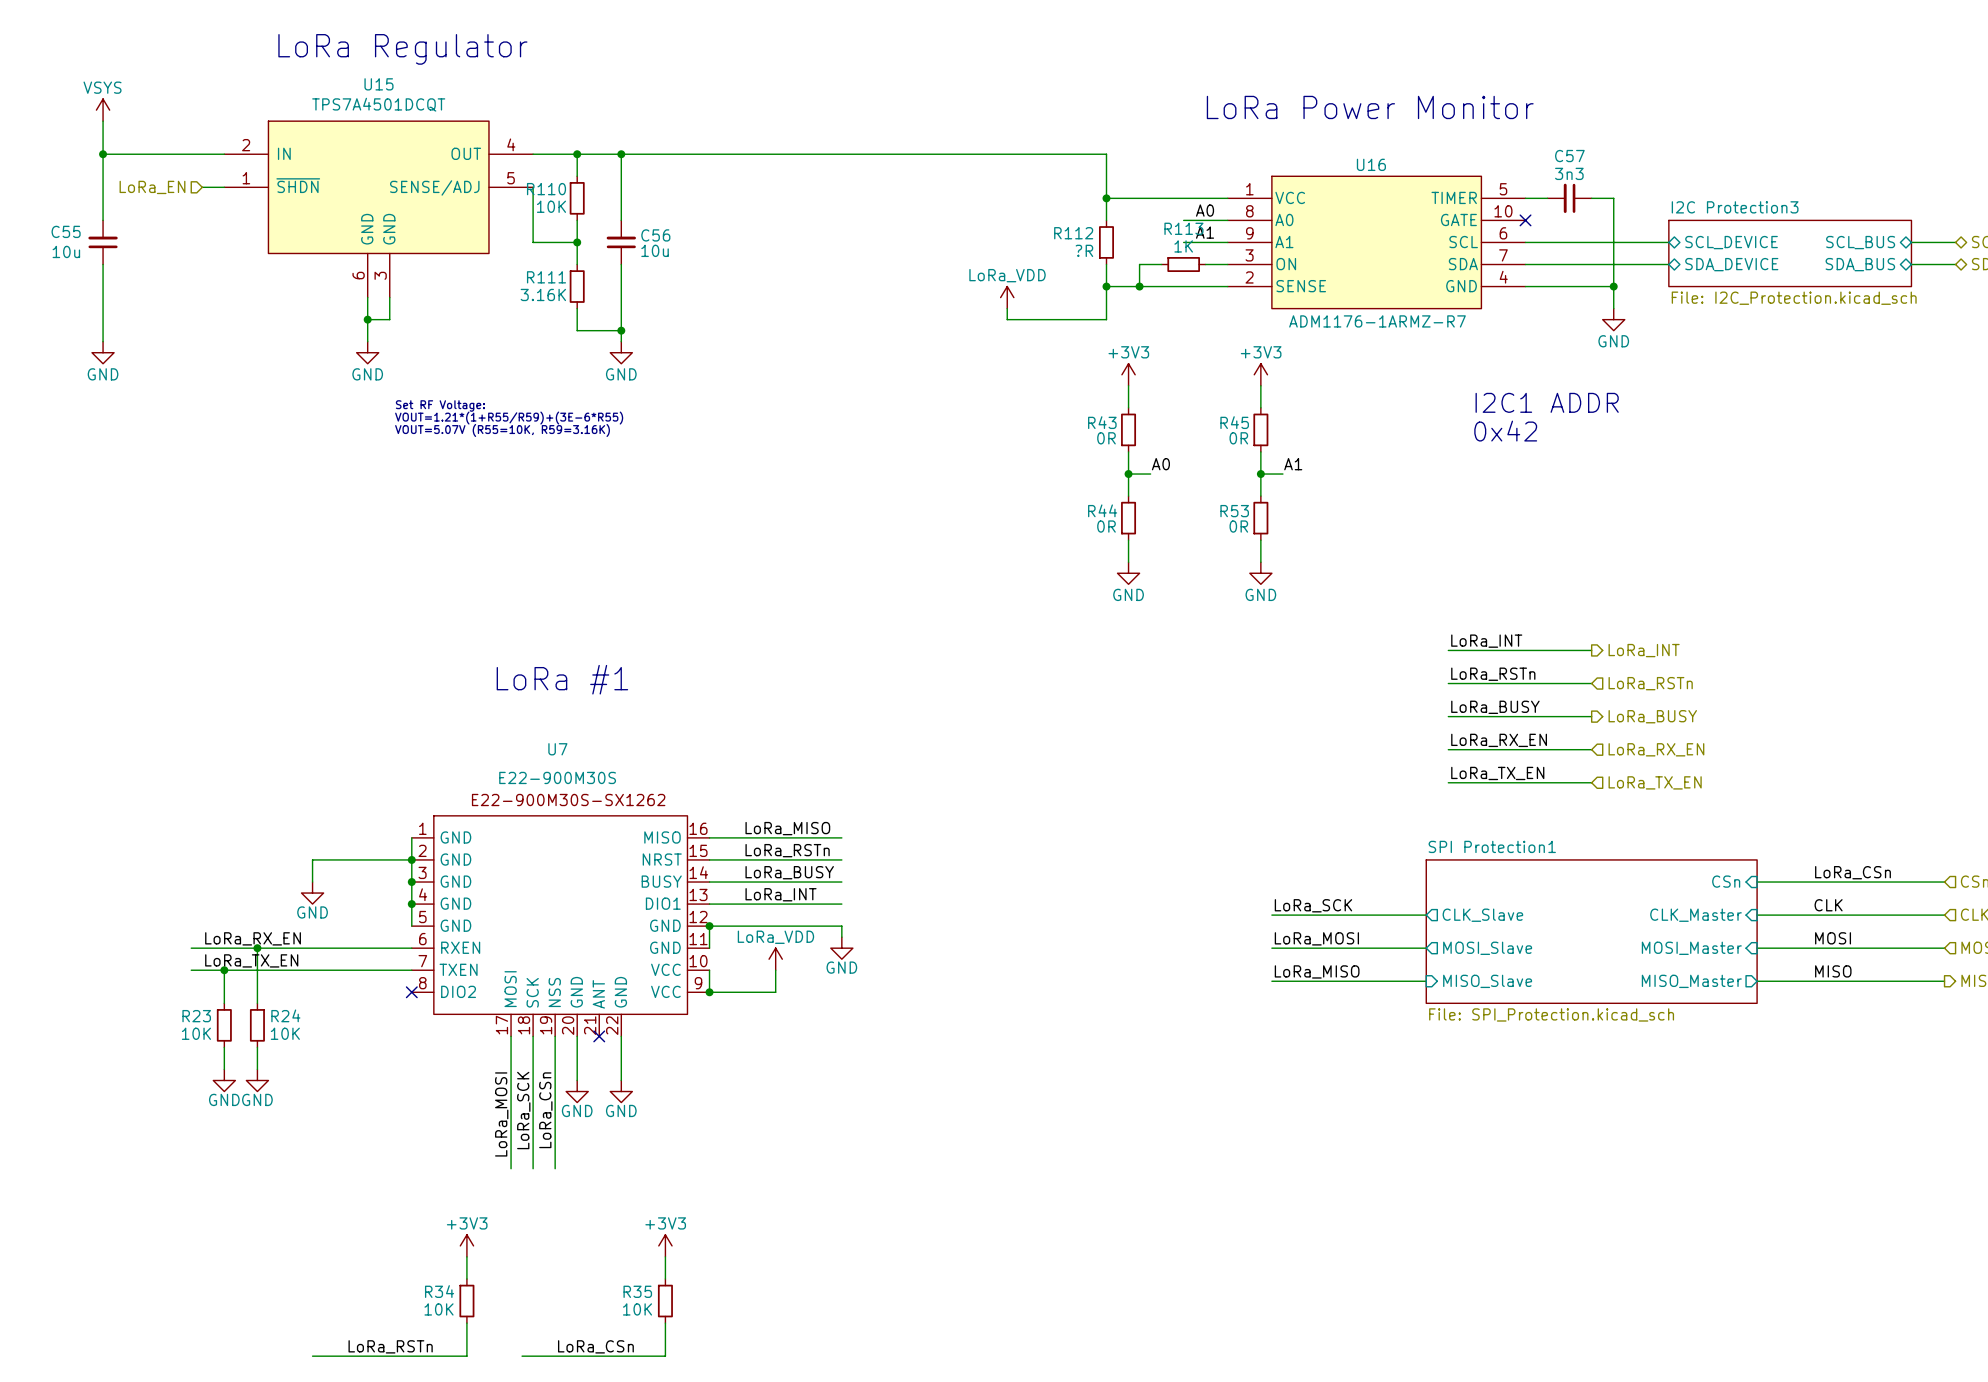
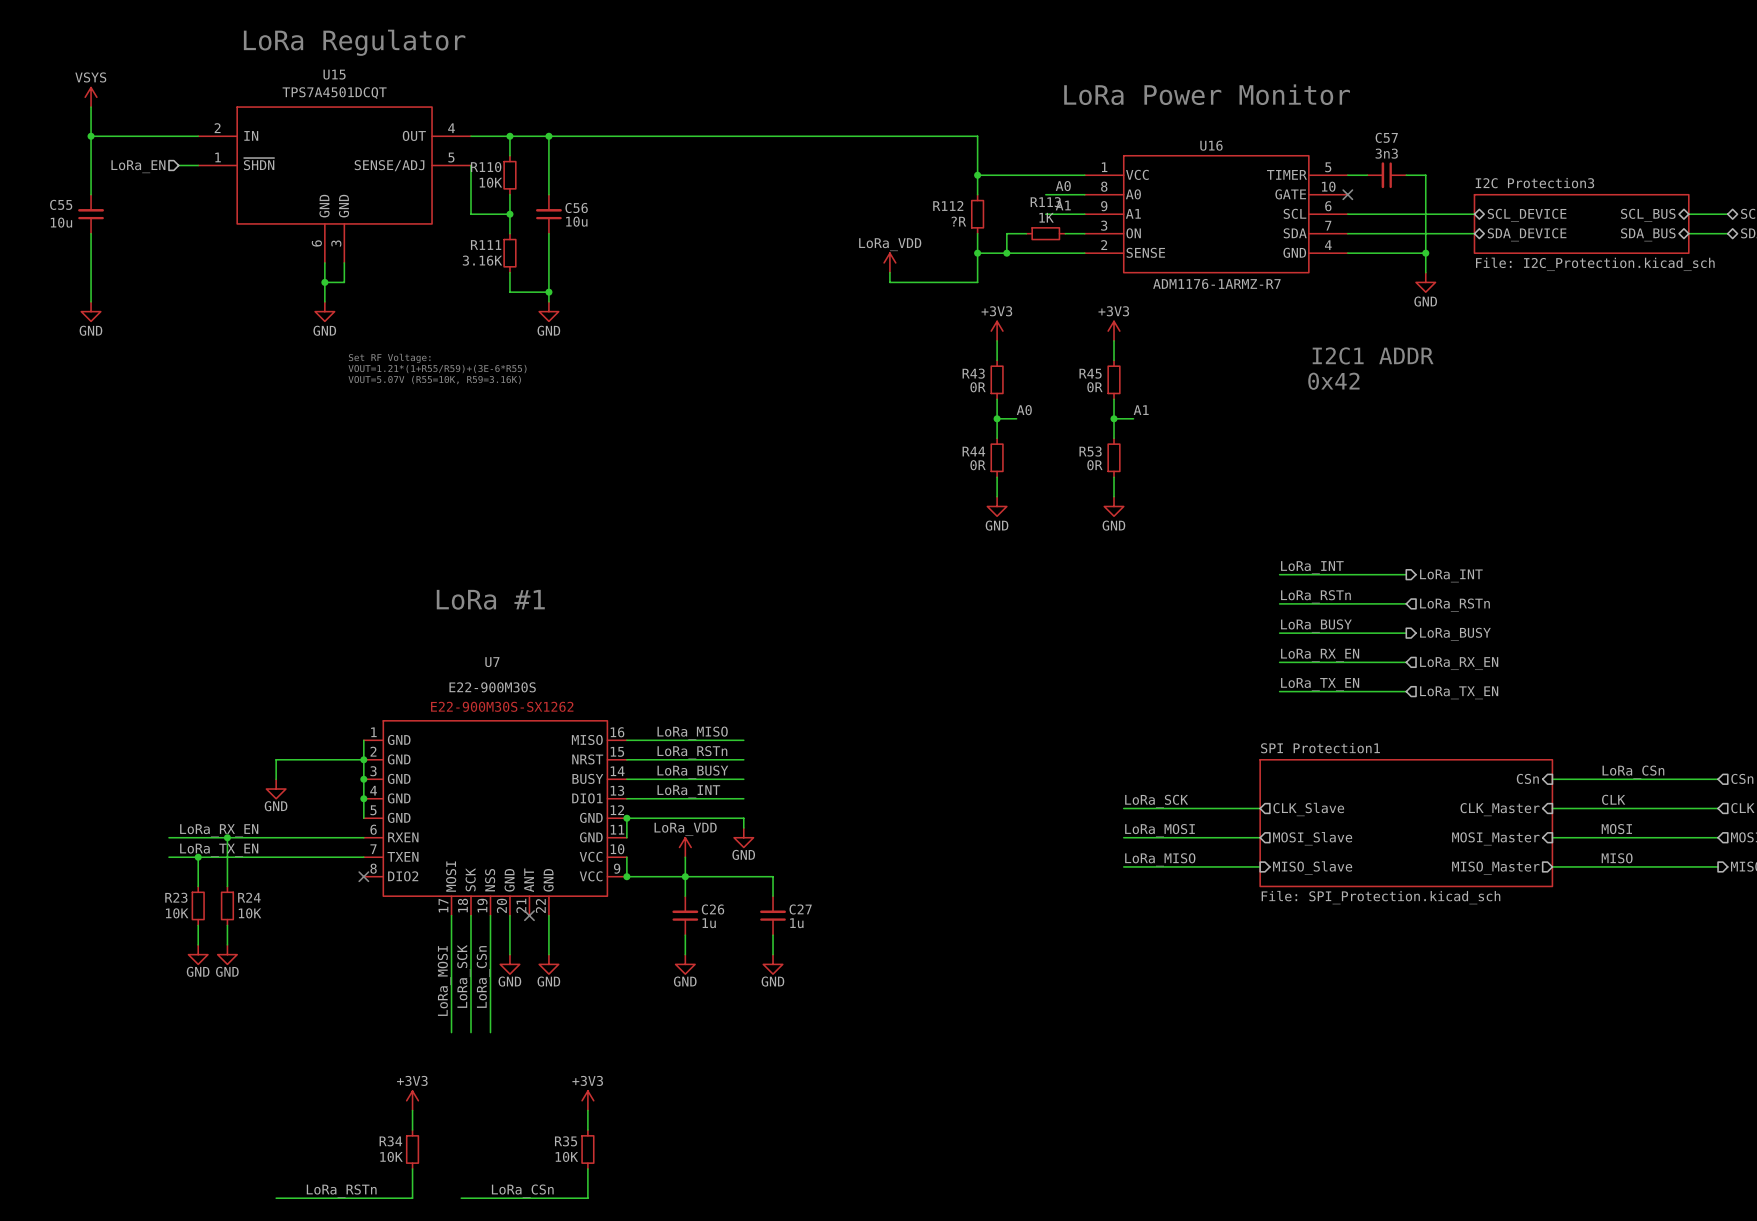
junction: none -> (685, 876)
wire: none -> (685, 896) (685, 876) (773, 876) (773, 896)
C26: none -> 1u (685, 915)
C27: none -> 1u (773, 915)
wire: none -> (685, 935) (685, 954)
wire: none -> (773, 935) (773, 954)
power symbol: none -> GND (685, 964)
power symbol: none -> GND (773, 964)

